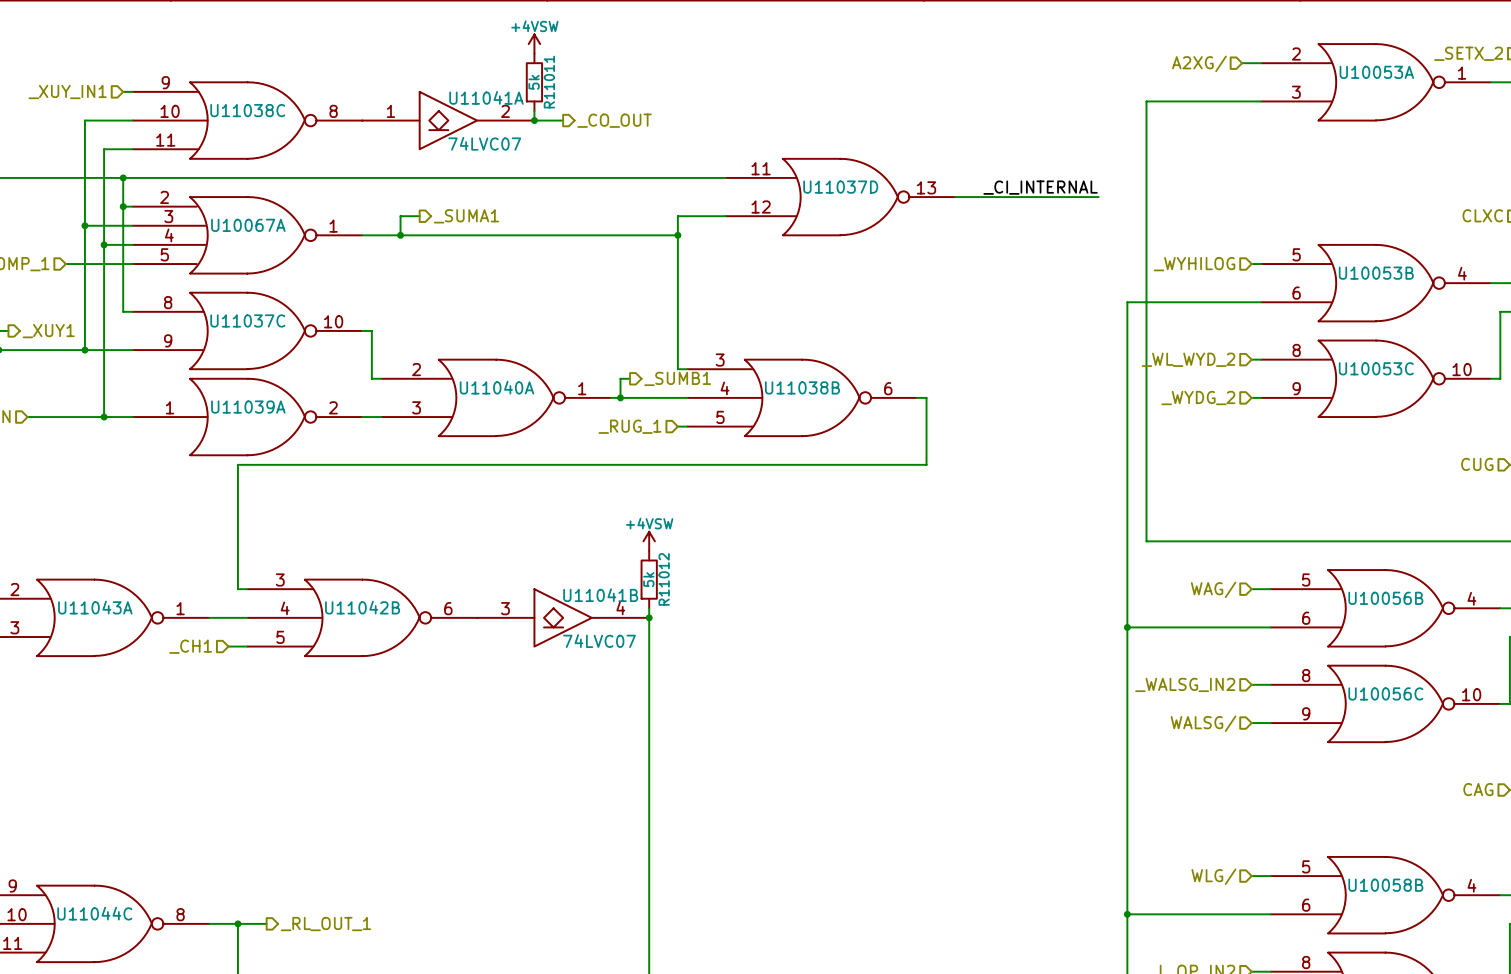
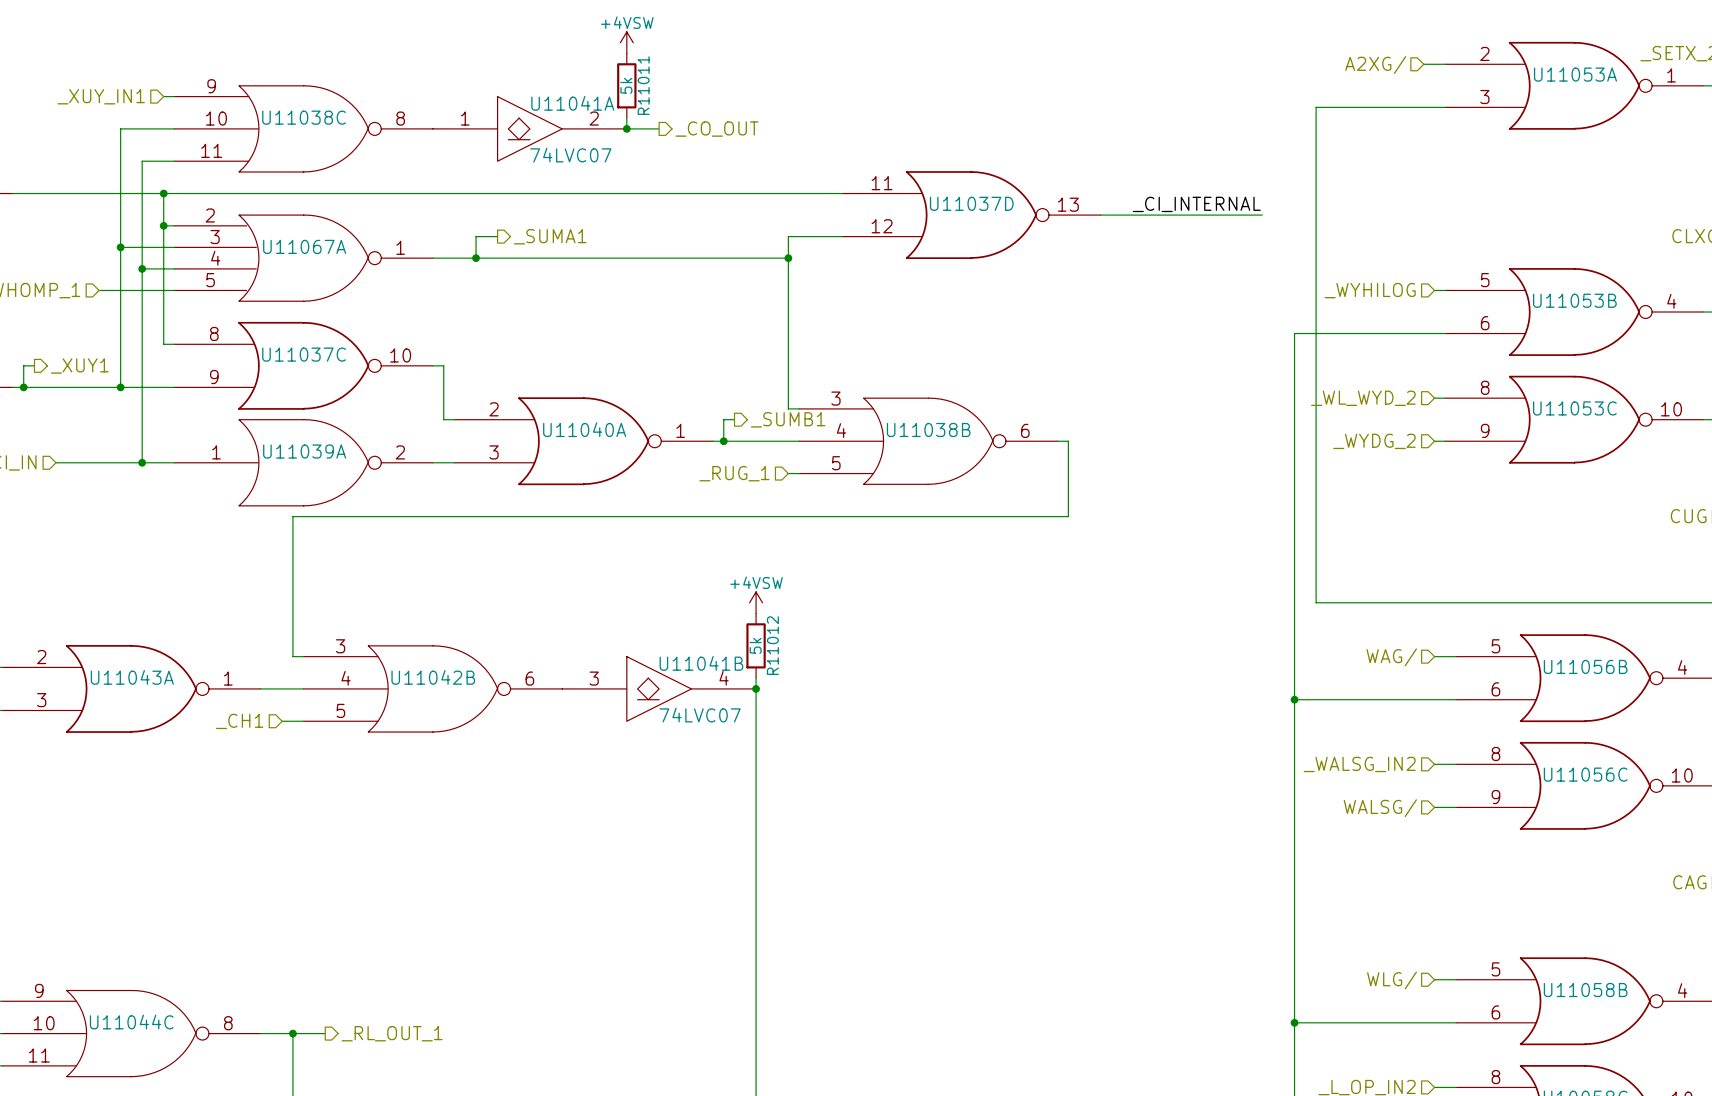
U10053A name: U10053A (1376, 72) -> U11053A (1575, 74)
U10067A name: U10067A (248, 225) -> U11067A (304, 246)
U10053B name: U10053B (1376, 273) -> U11053B (1574, 300)
U10053C name: U10053C (1376, 368) -> U11053C (1574, 408)
U10056B name: U10056B (1385, 598) -> U11056B (1585, 666)
U10056C name: U10056C (1385, 693) -> U11056C (1585, 774)
U10058B name: U10058B (1385, 885) -> U11058B (1585, 990)

